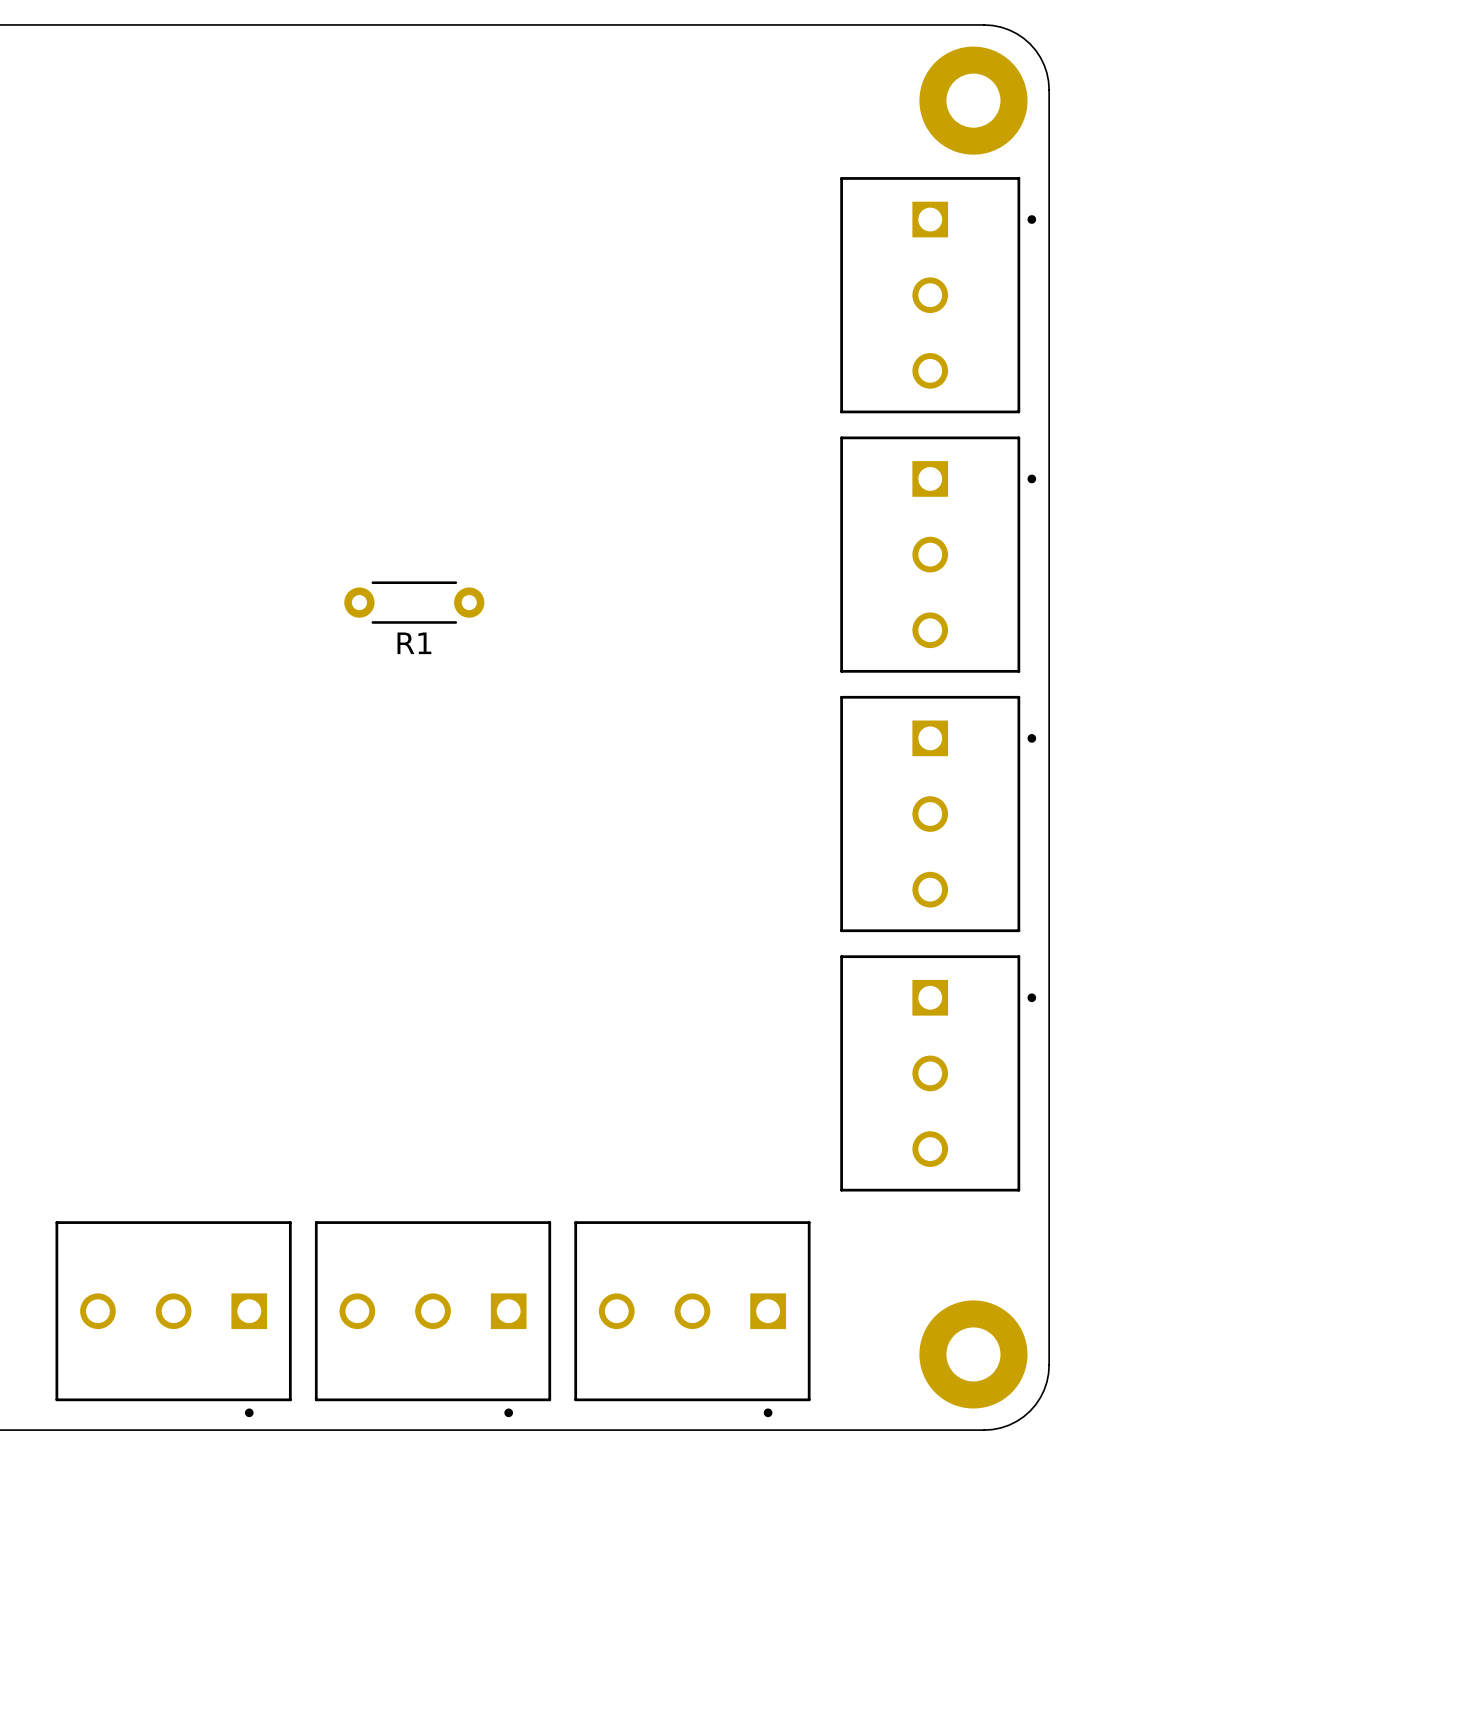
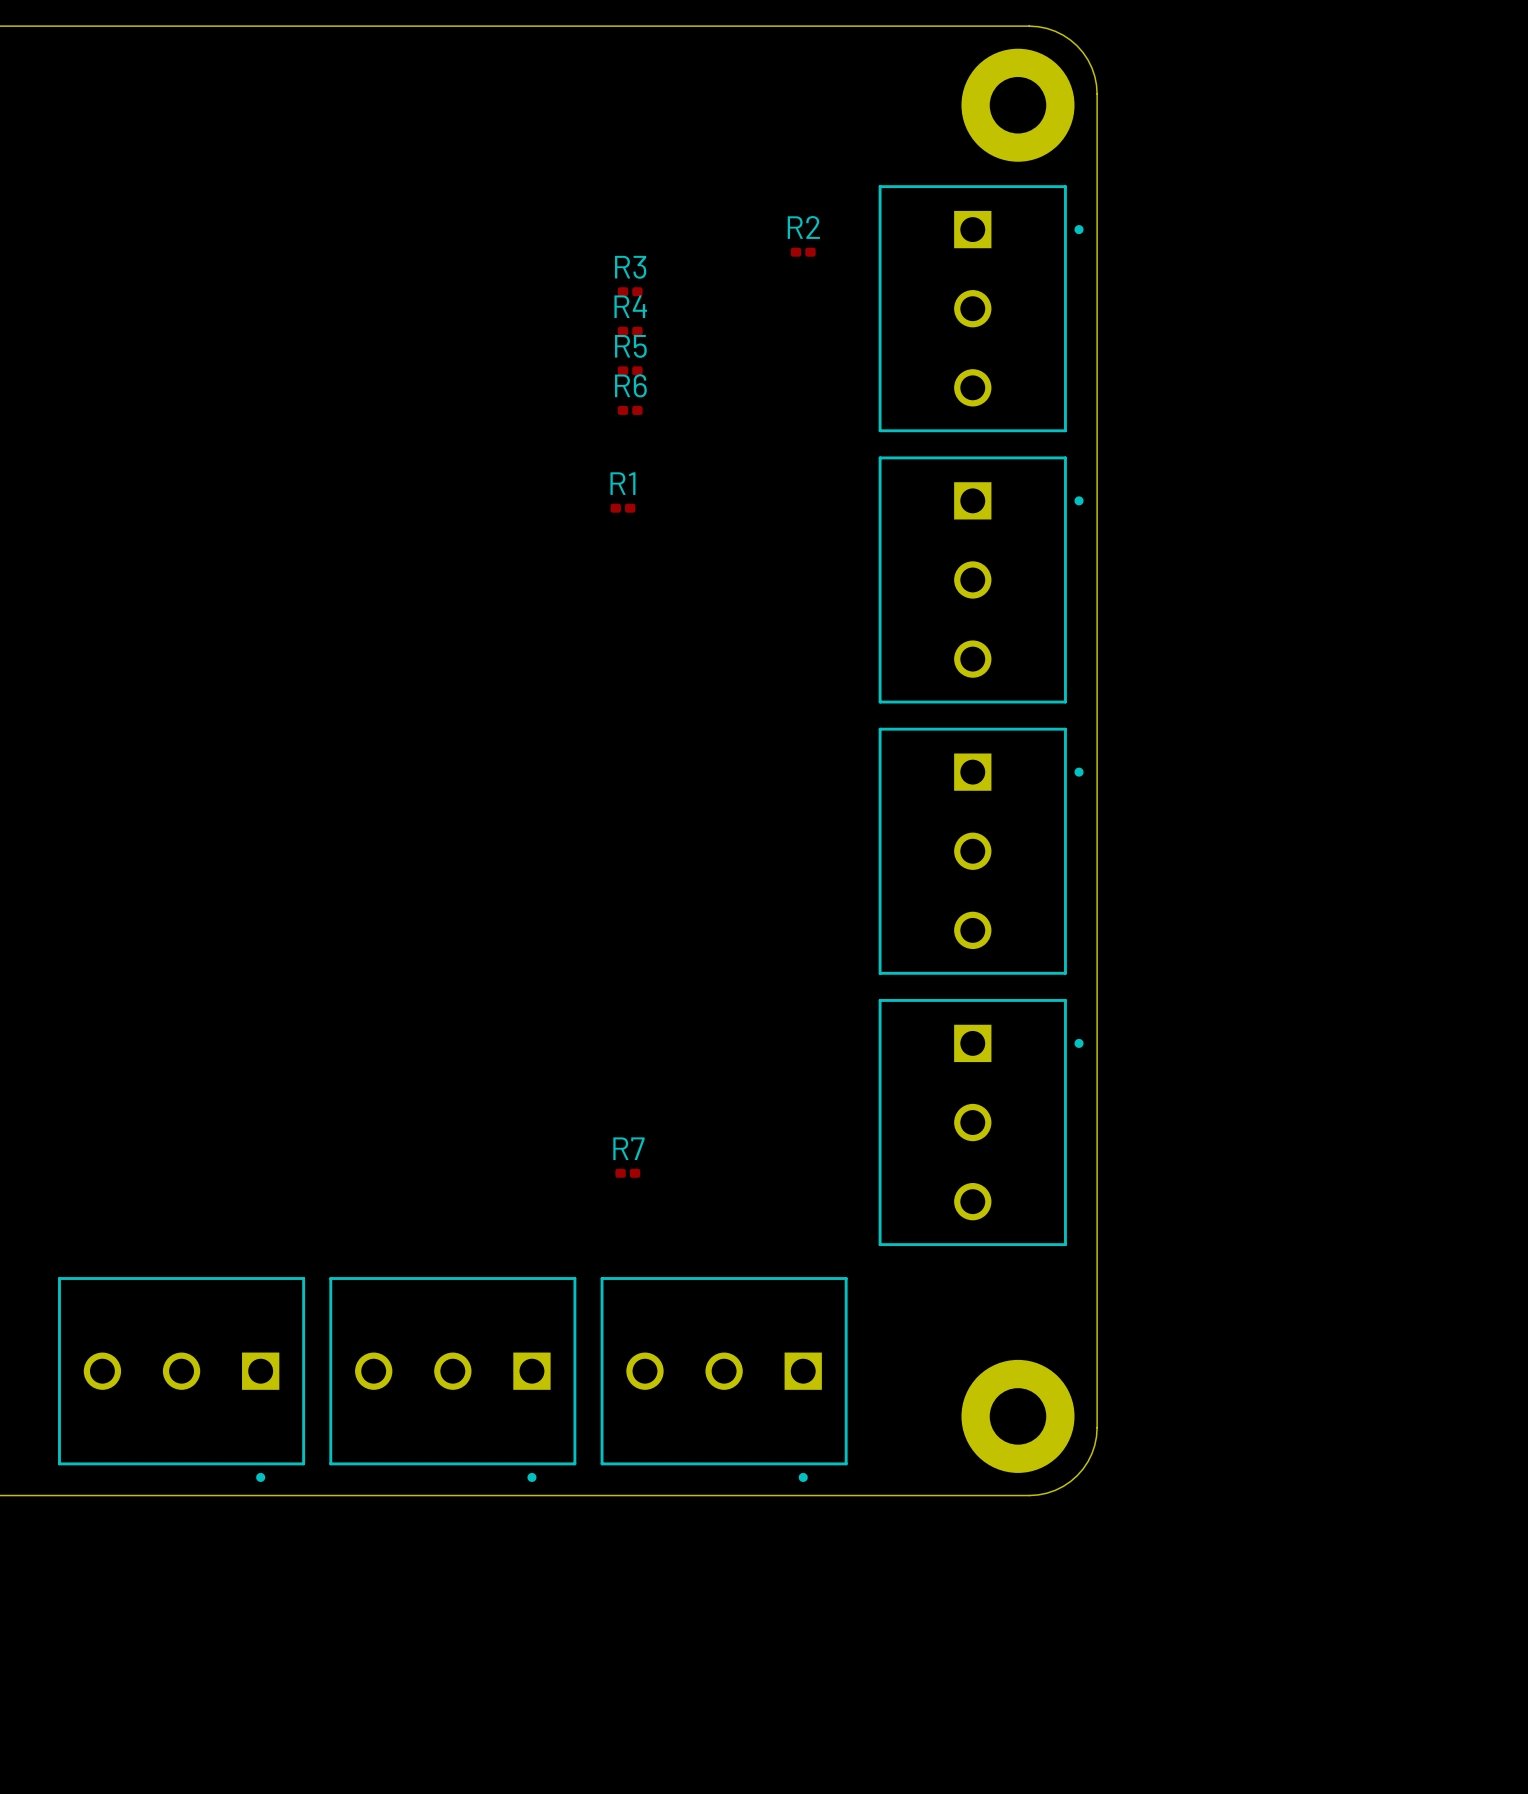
R2: none -> (803, 252)
R3: none -> (630, 291)
R4: none -> (630, 331)
R5: none -> (630, 370)
R6: none -> (630, 410)
R1 footprint: [344, 581, 485, 624] -> [610, 503, 636, 513]
R1 name position: R1 (414, 643) -> R1 (622, 483)
R7: none -> (627, 1173)

